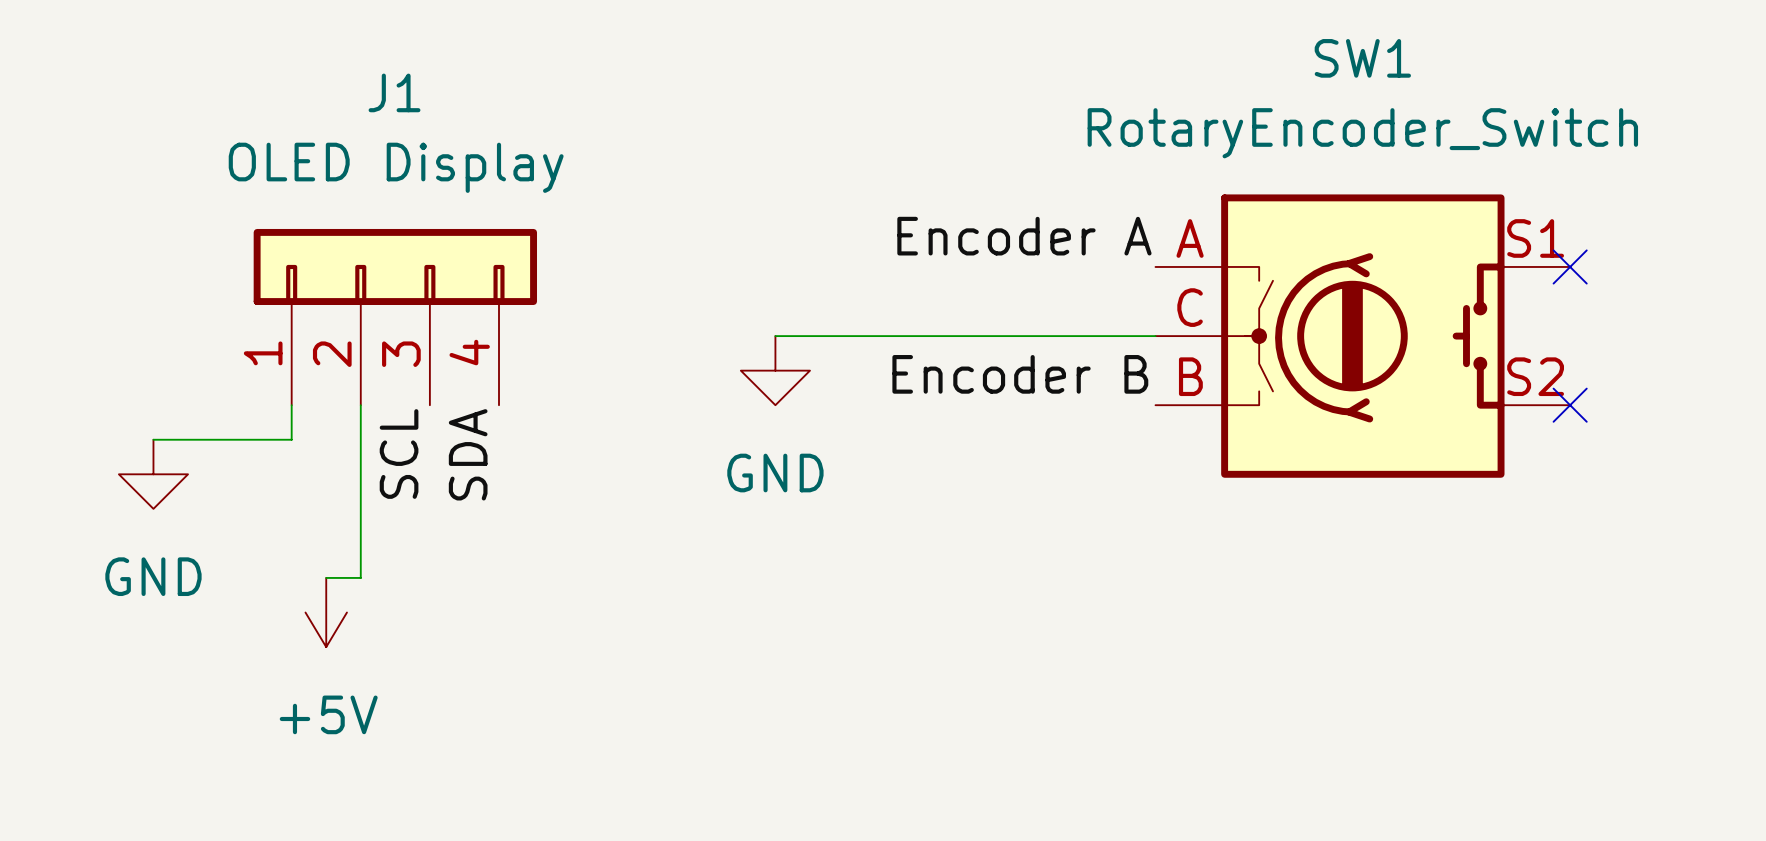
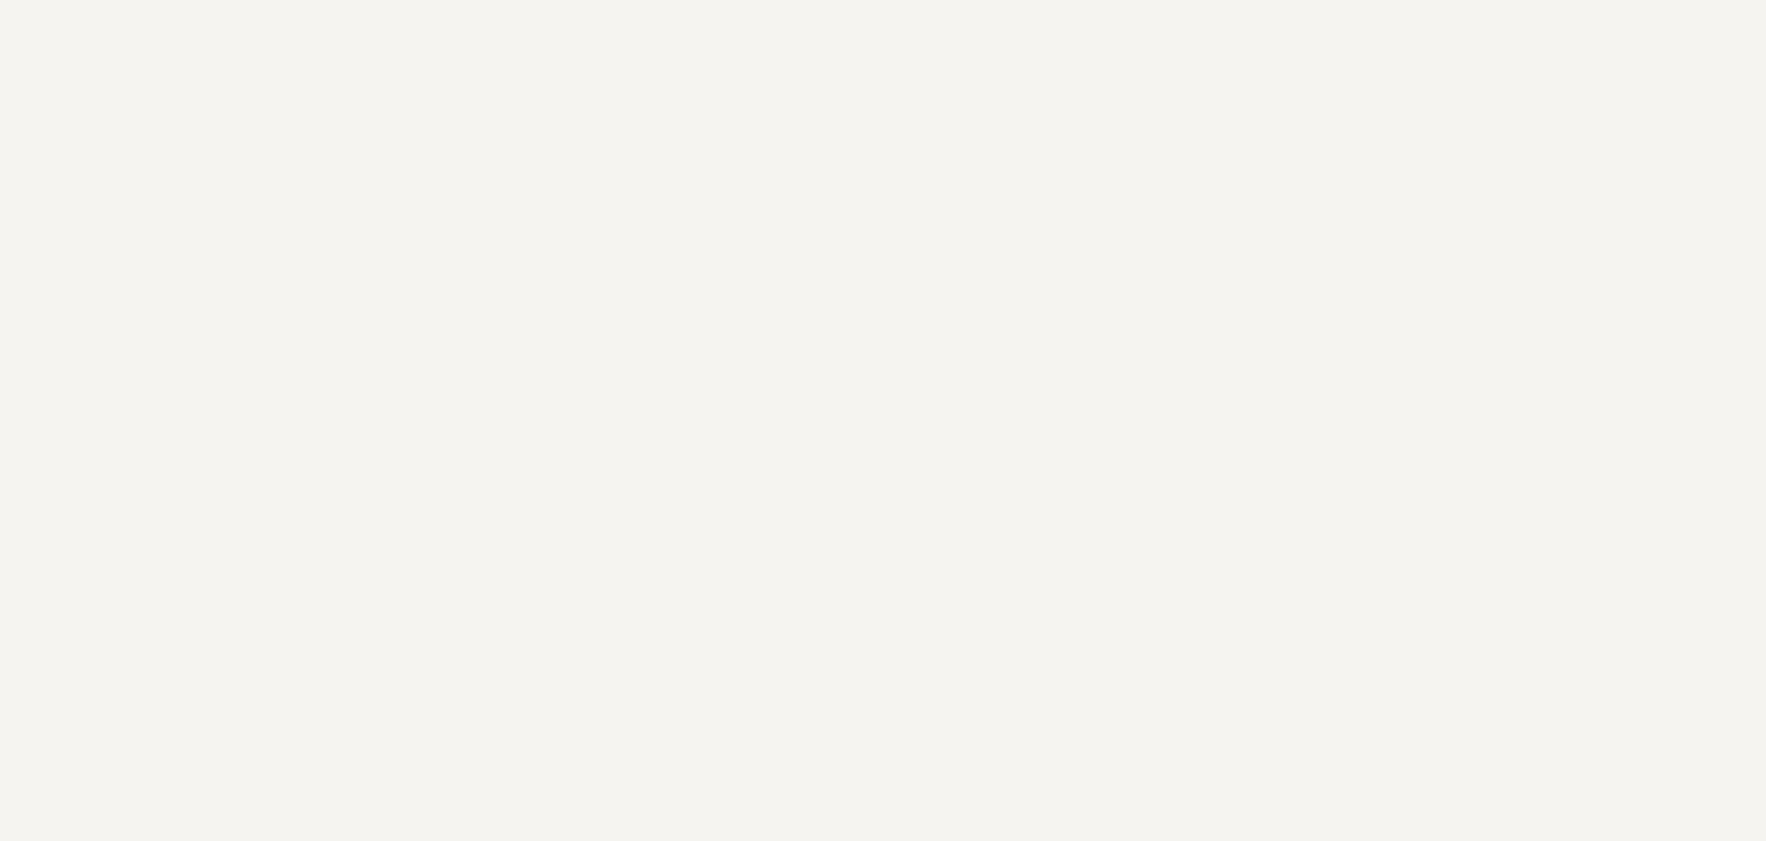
label: Encoder A (1024, 236) -> none
no-connect mark: (1570, 266) -> none
J1: OLED Display (395, 317) -> none
wire: (775, 336) (1155, 336) -> none
SW1: RotaryEncoder_Switch (1362, 336) -> none
power symbol: GND (775, 370) -> none
label: Encoder B (1020, 374) -> none
wire: (291, 405) (291, 439) (153, 439) -> none
wire: (360, 405) (360, 577) (326, 577) -> none
no-connect mark: (1570, 405) -> none
label: SCL (399, 453) -> none
label: SDA (468, 454) -> none
power symbol: GND (153, 474) -> none
power symbol: +5V (326, 612) -> none

